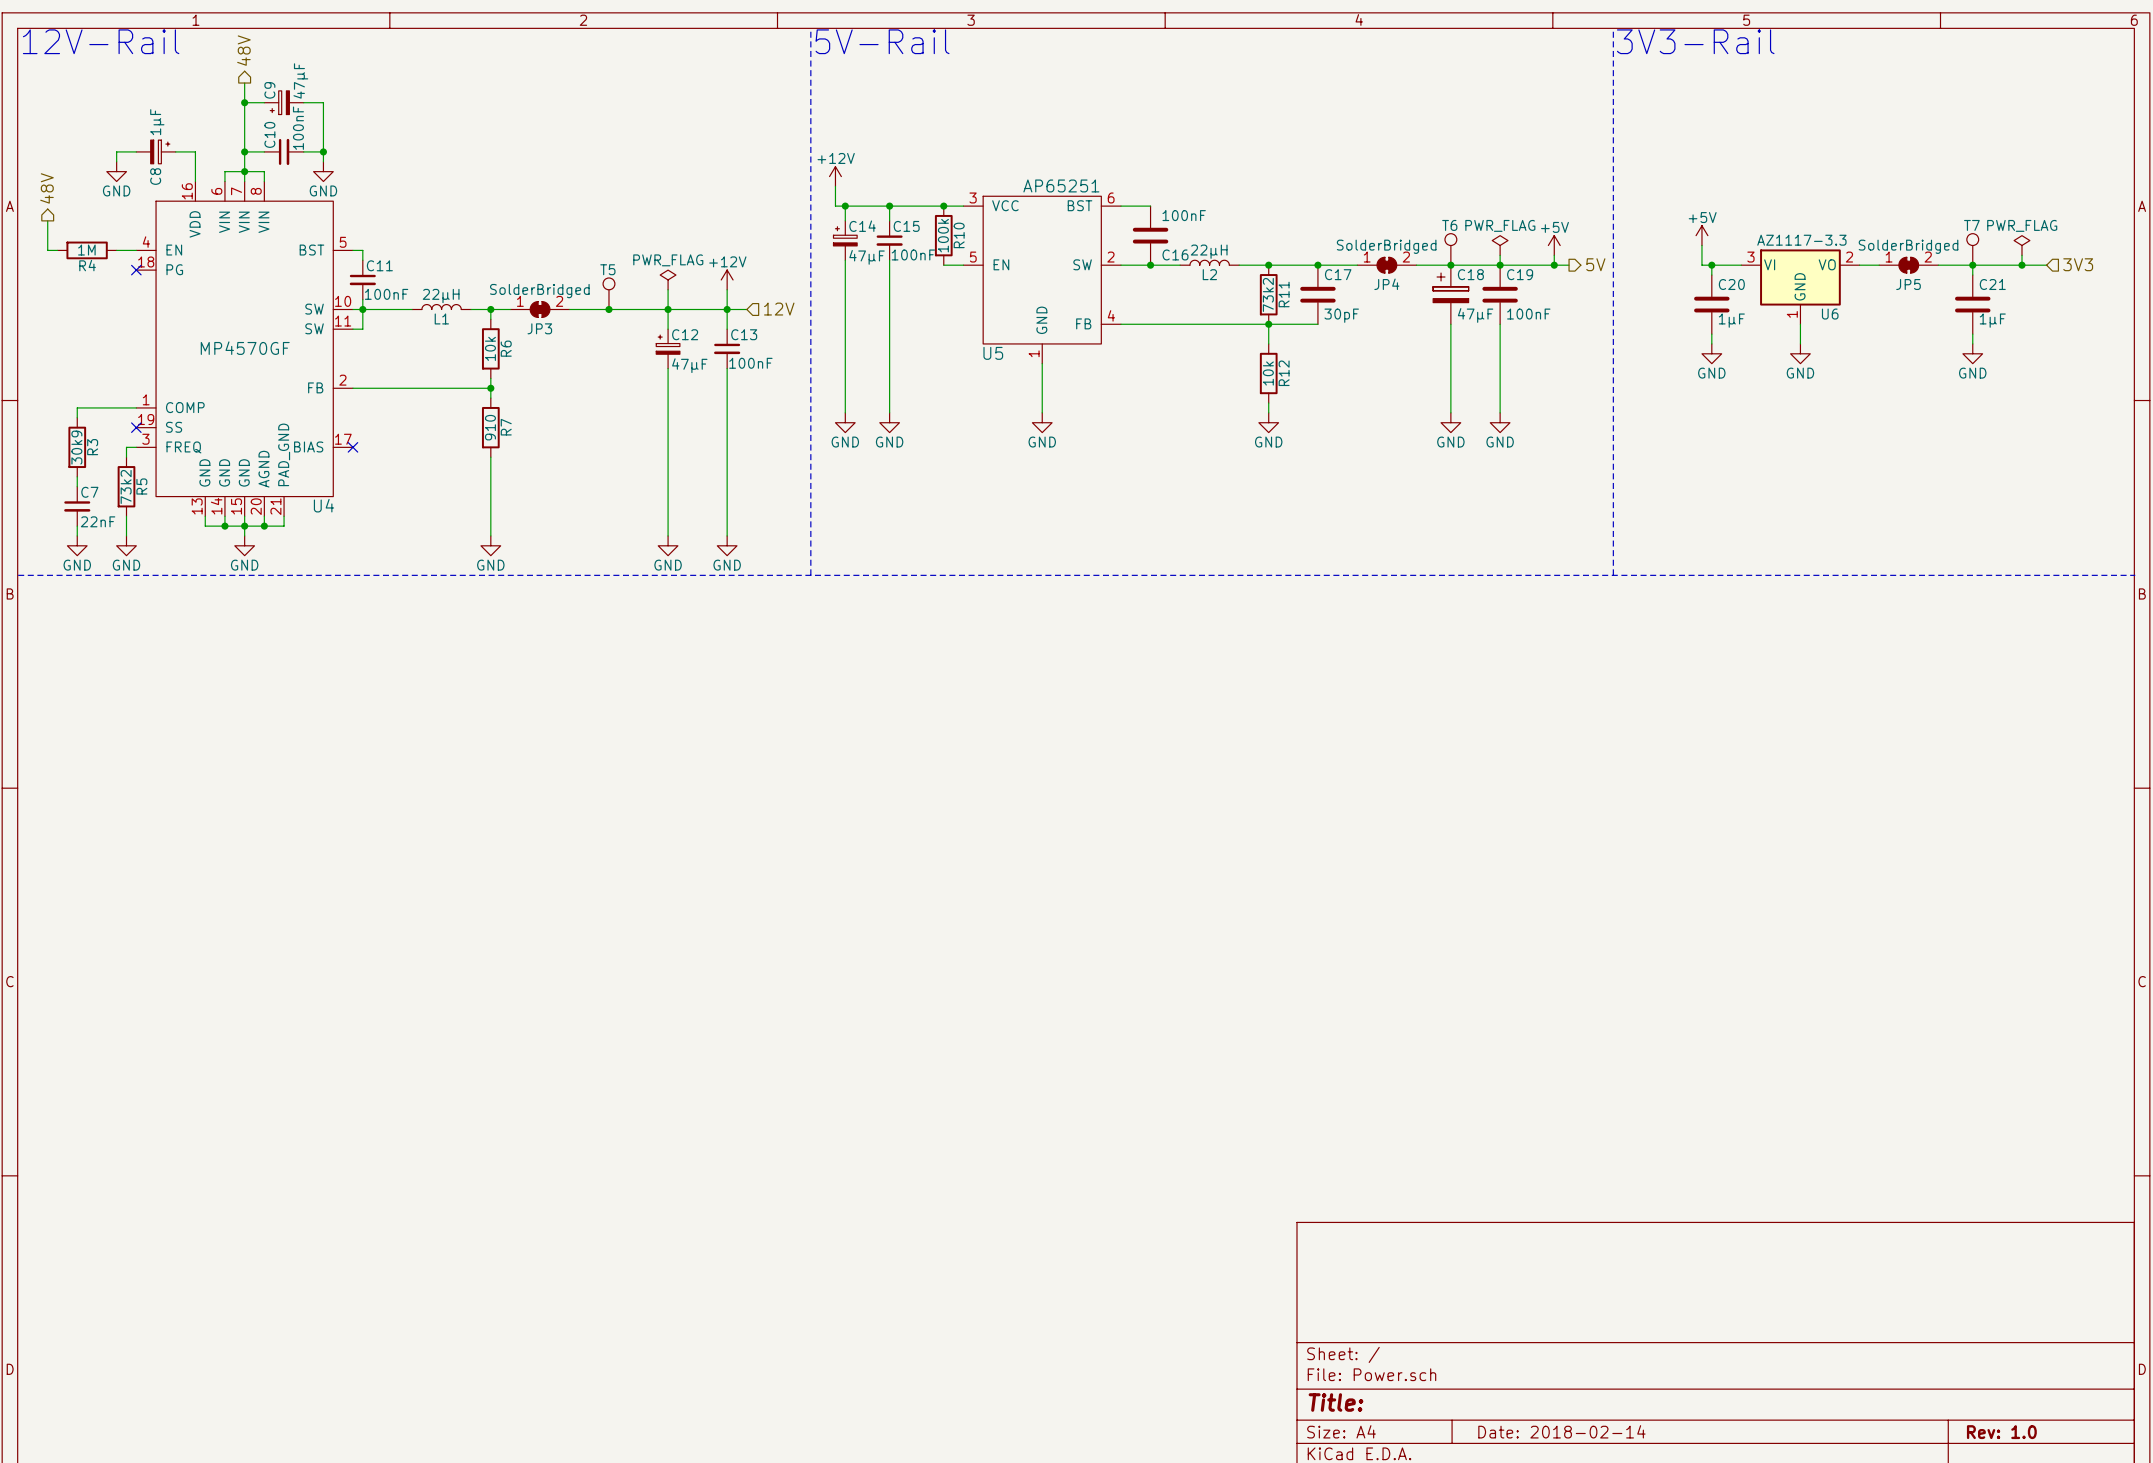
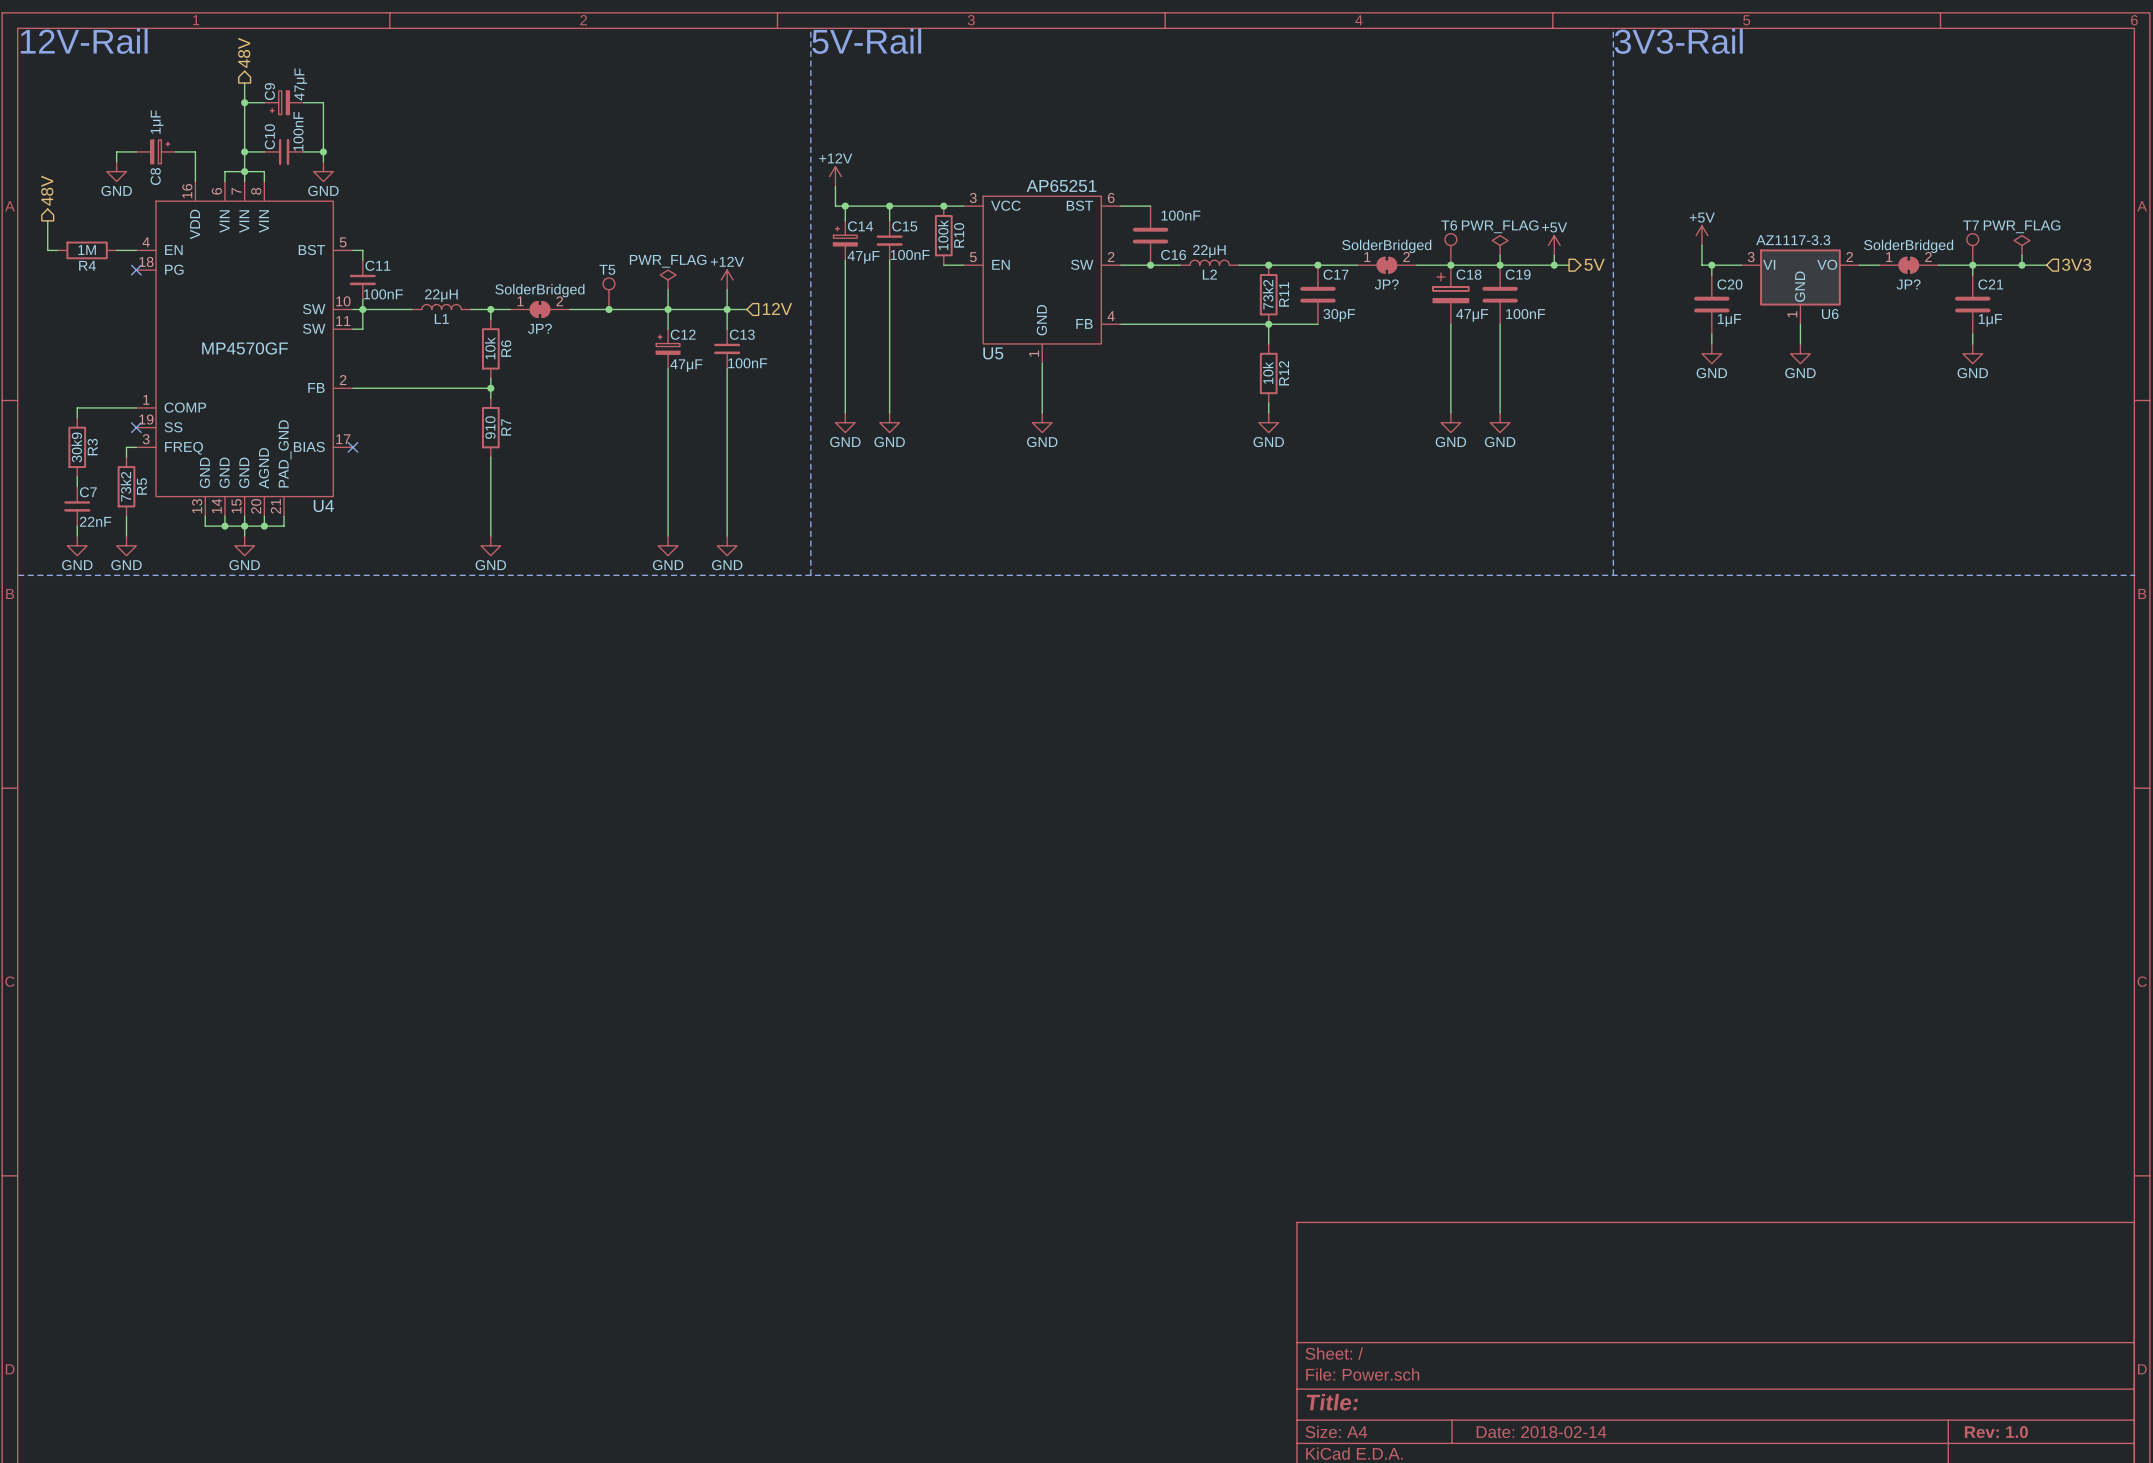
JP4 name: JP4 (1386, 284) -> JP? (1386, 284)
JP5 name: JP5 (1908, 284) -> JP? (1908, 284)
JP3 name: JP3 (539, 328) -> JP? (539, 328)

